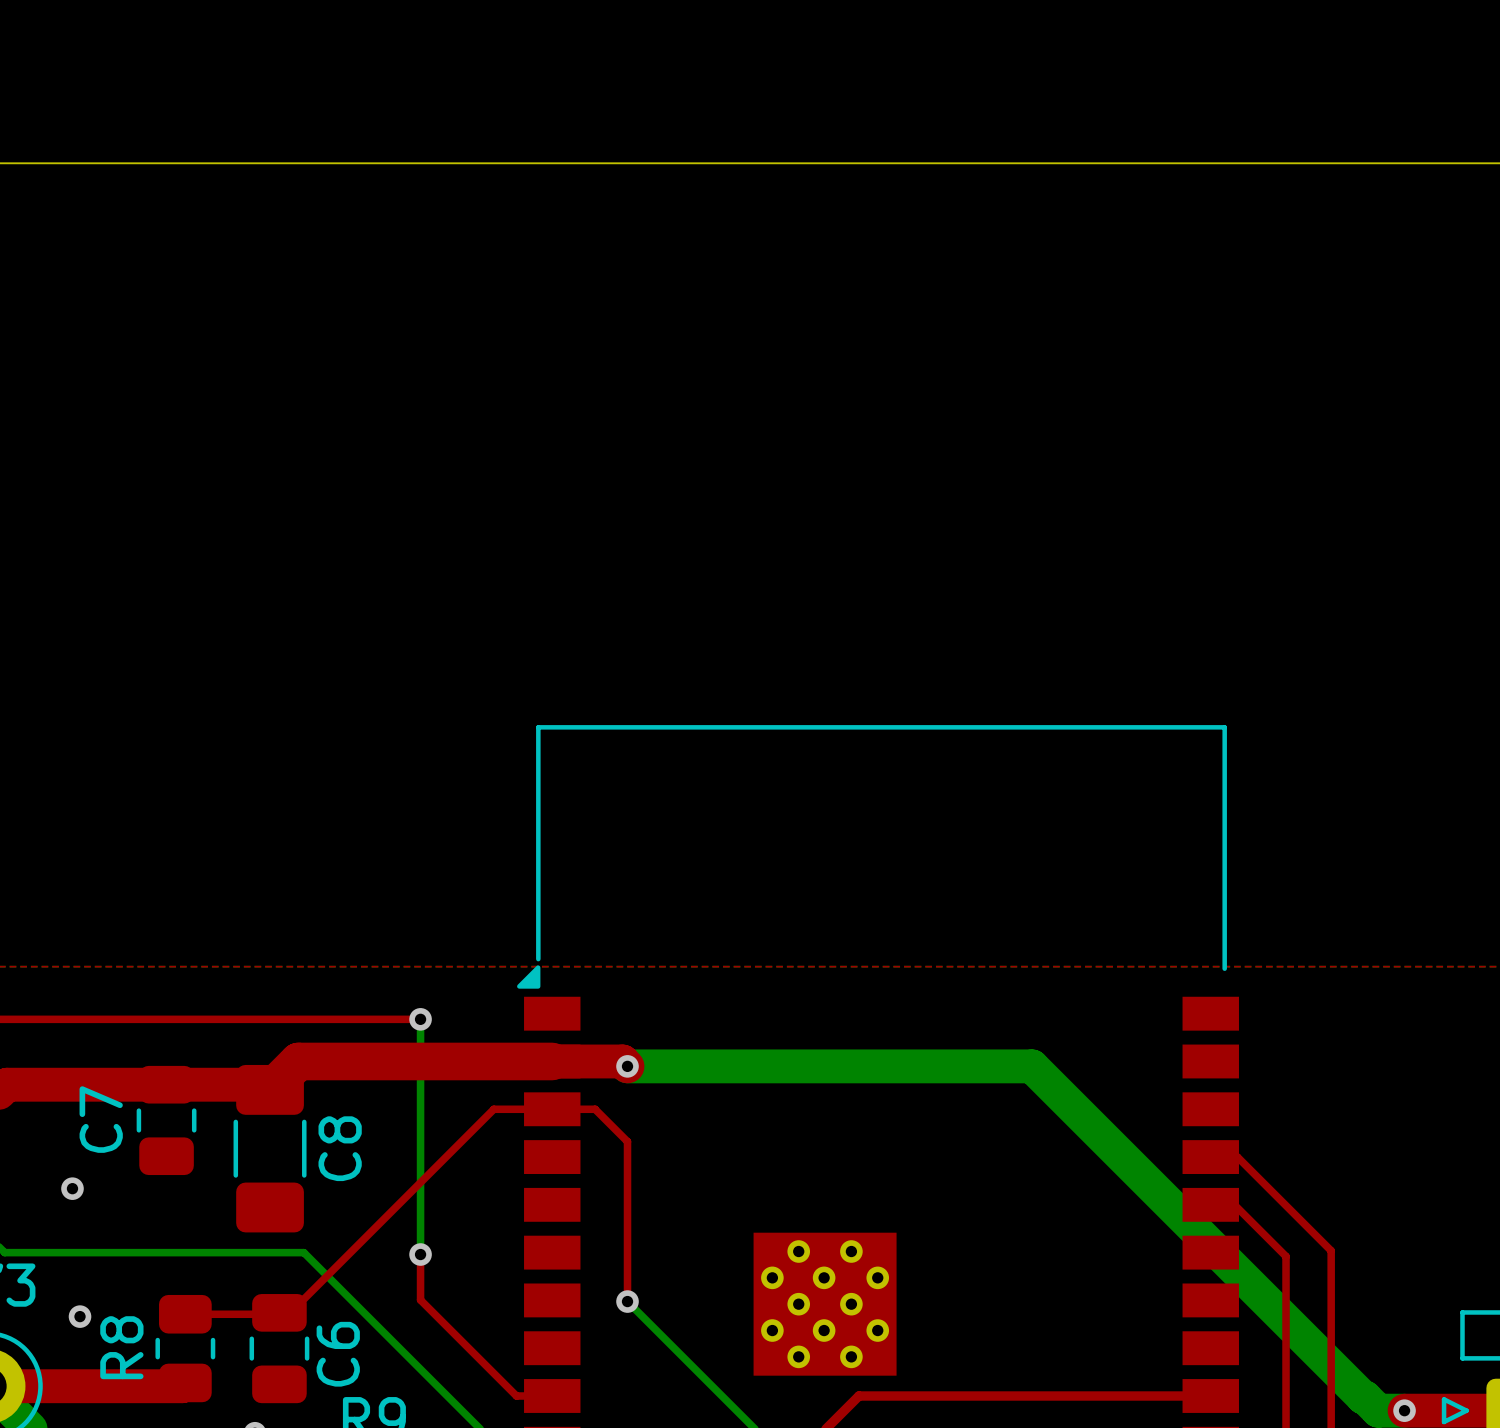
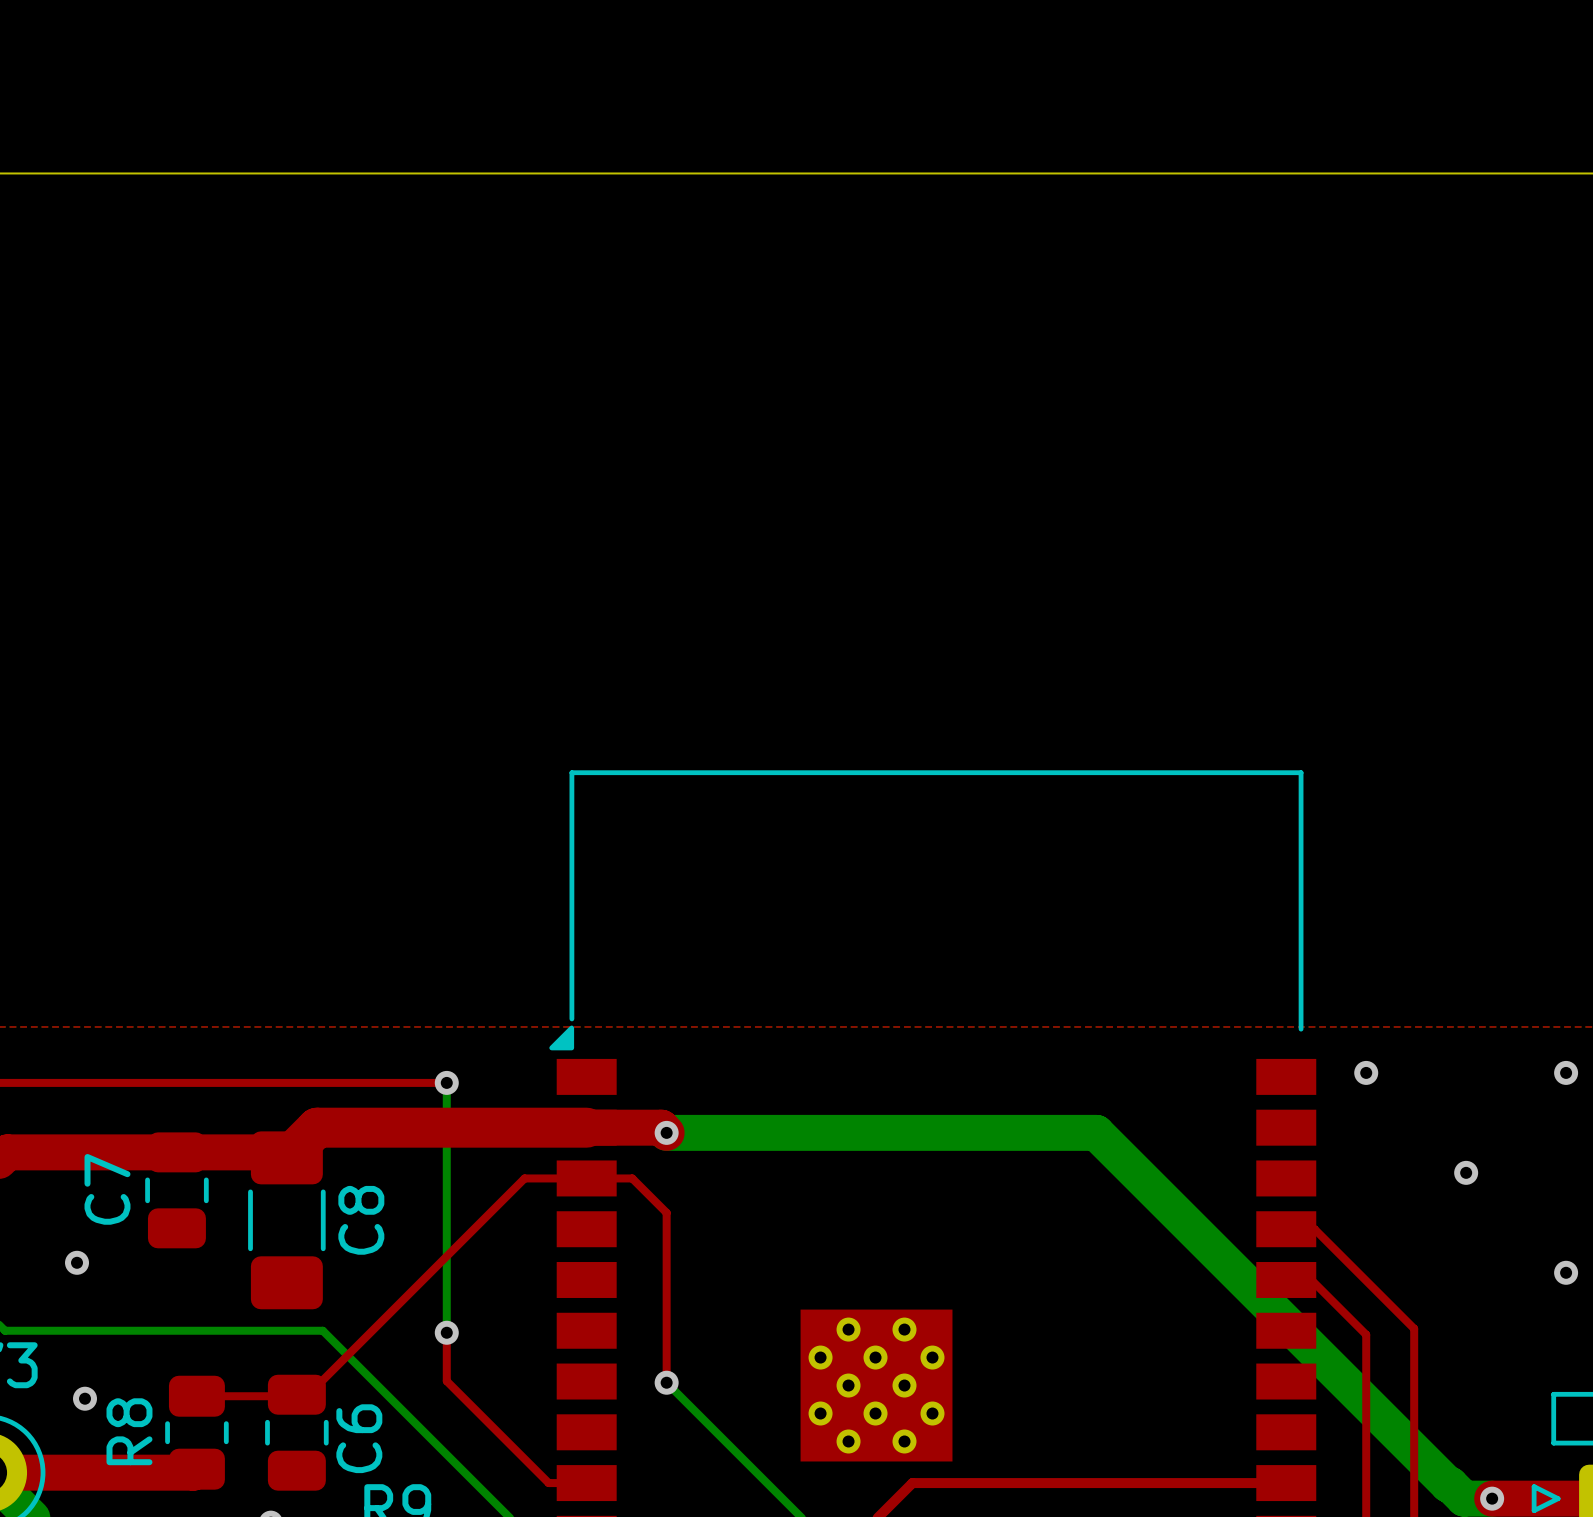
via: none -> (1366, 1072)
via: none -> (1566, 1072)
via: none -> (1466, 1172)
via: none -> (1566, 1272)

